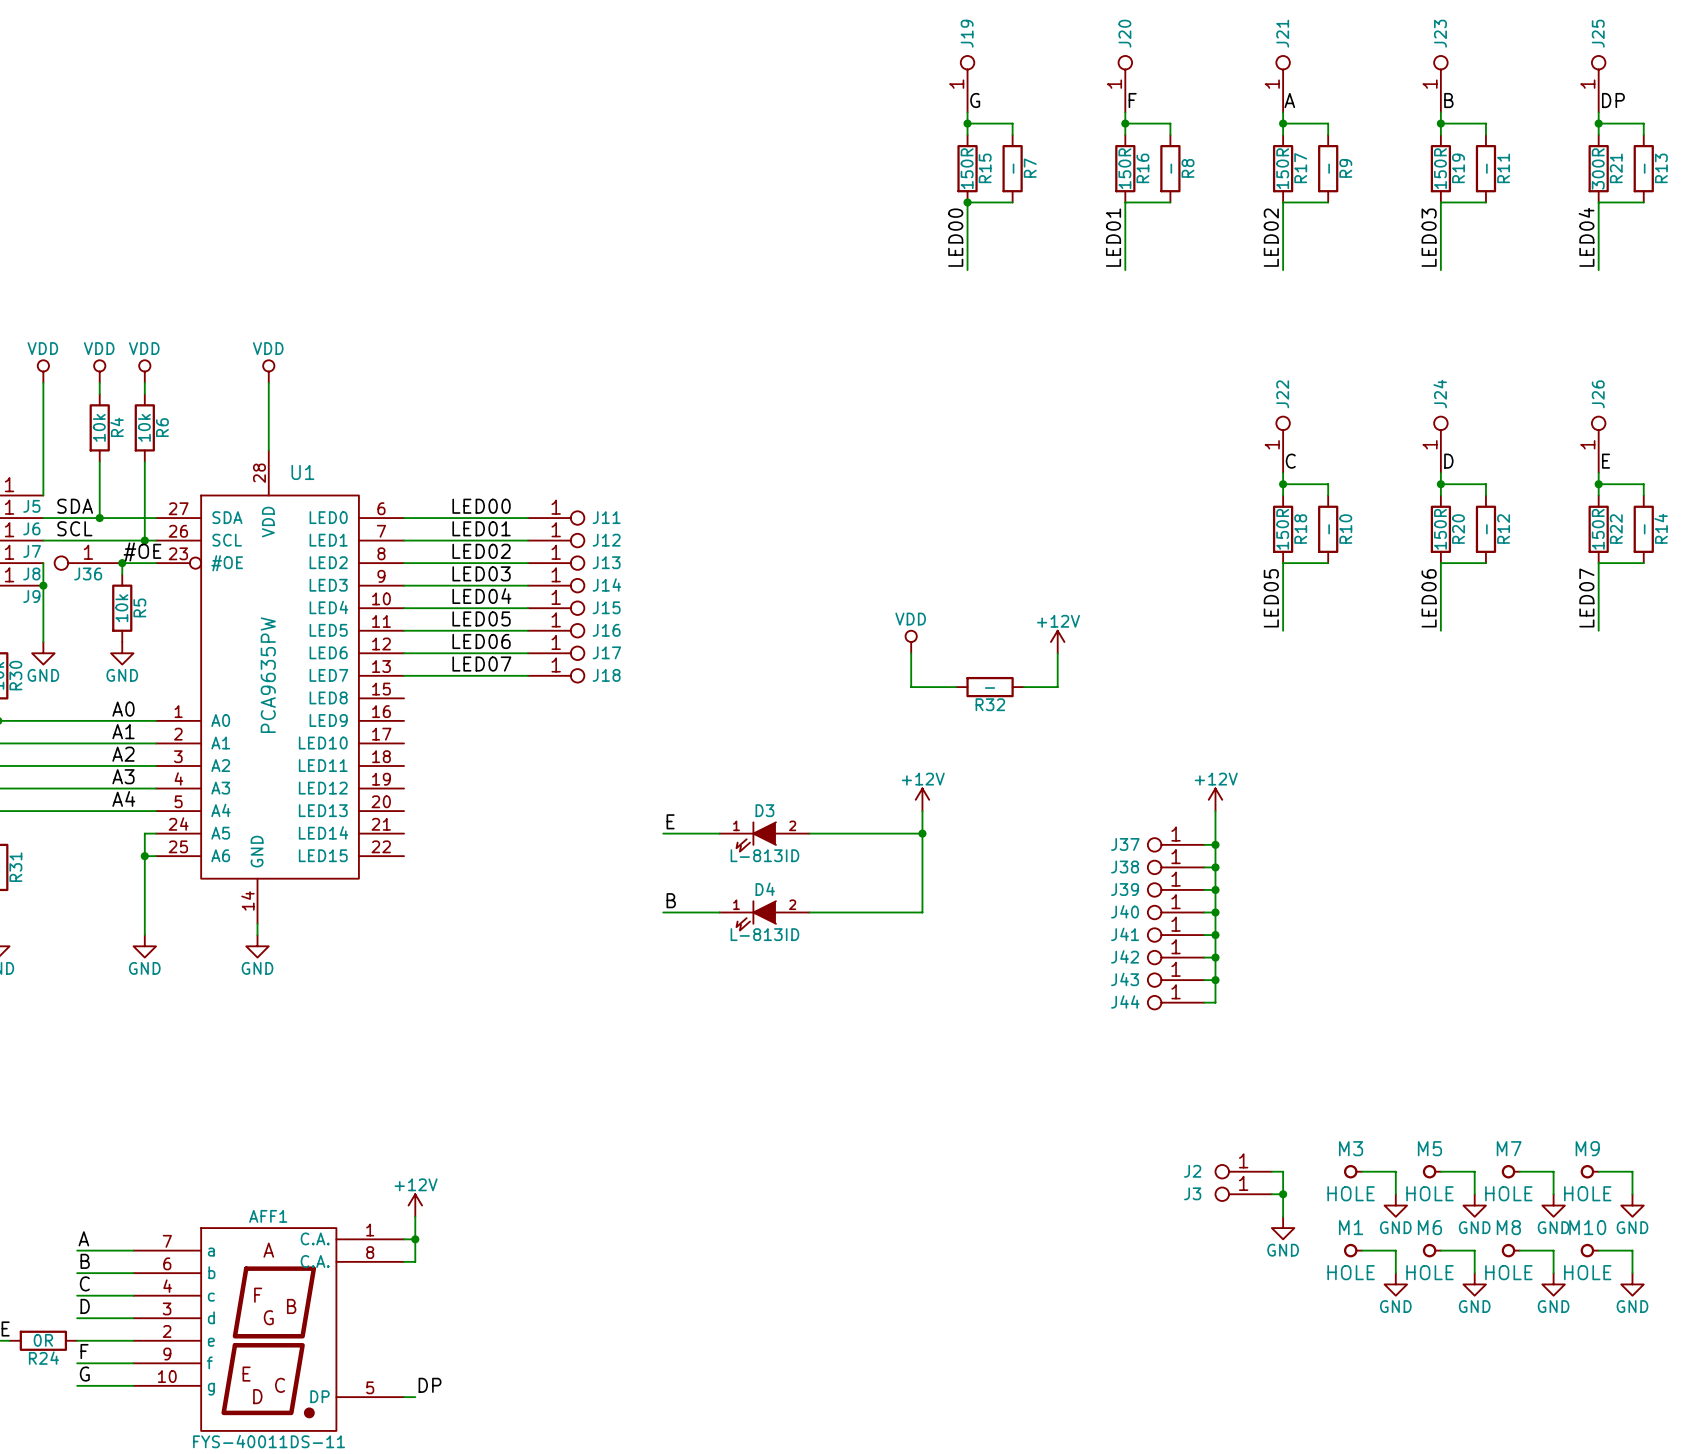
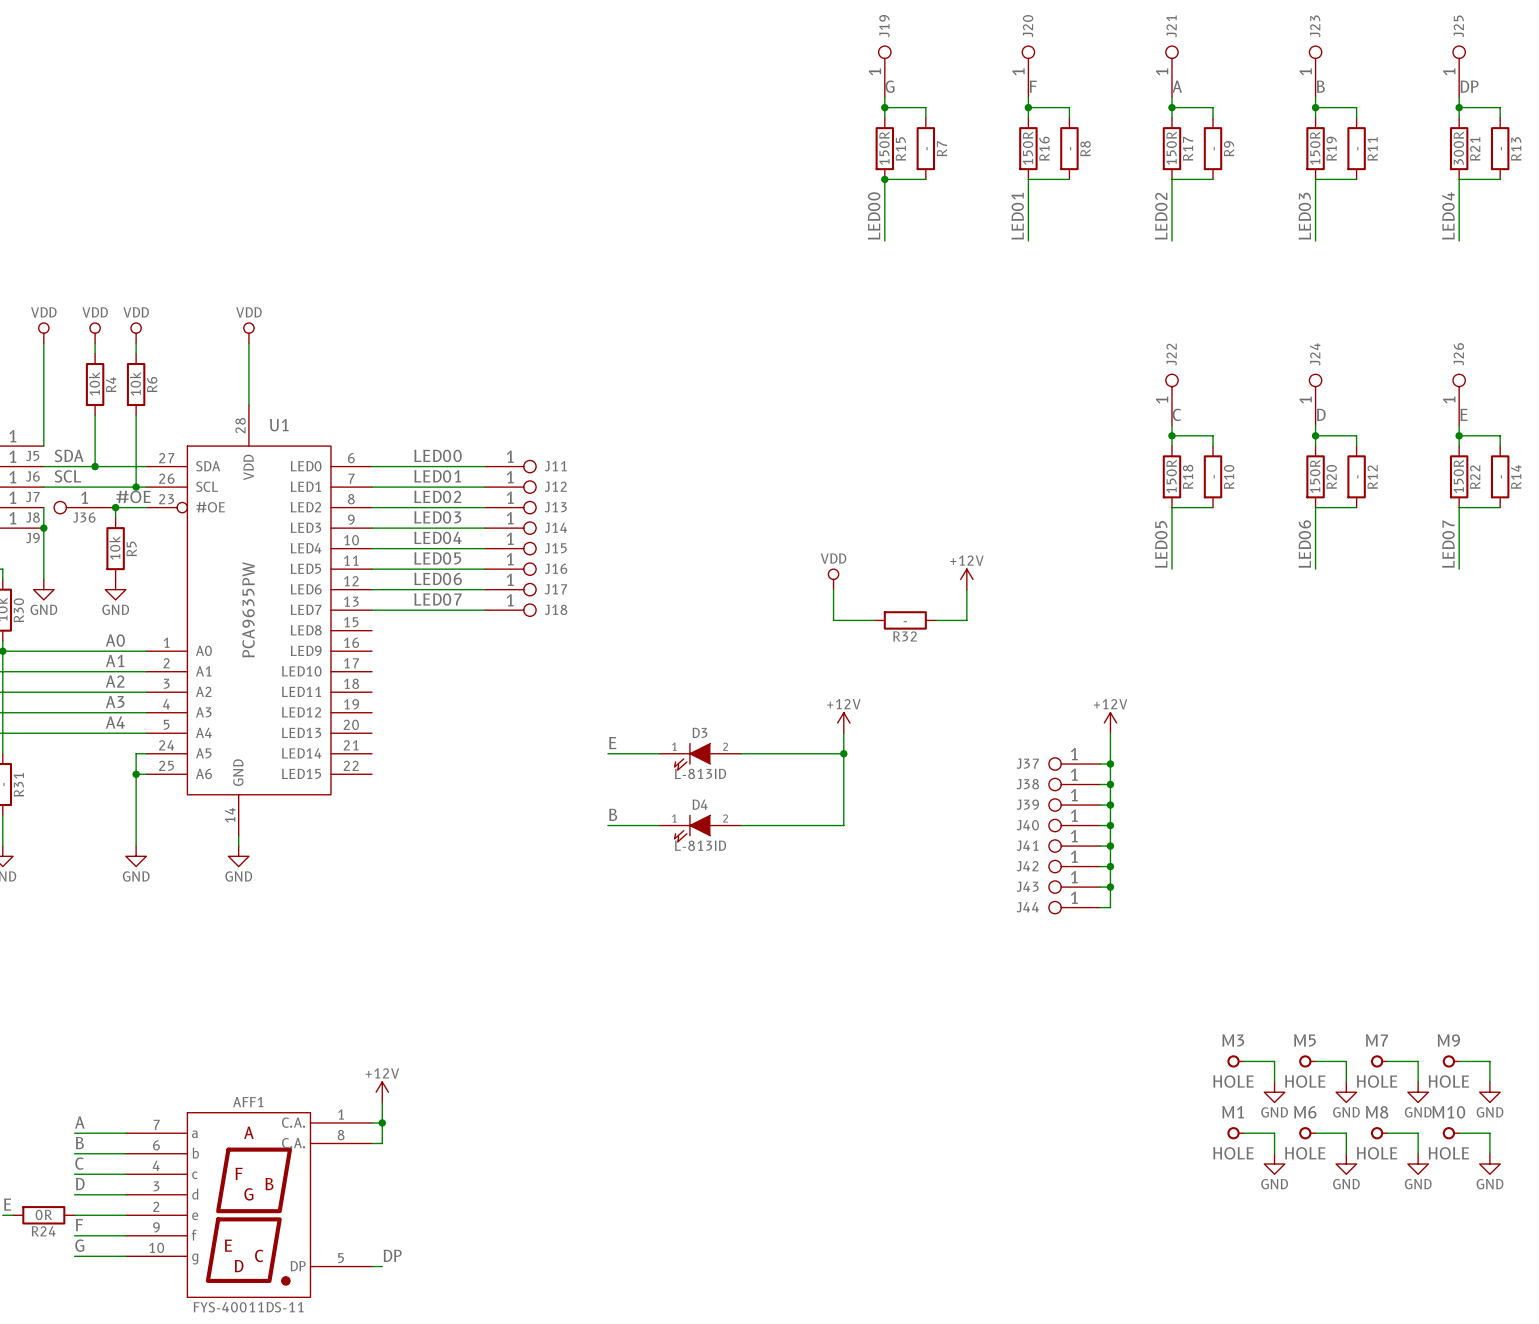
J2: (1243, 1171) -> none
wire: (1271, 1171) (1283, 1171) (1283, 1216) -> none
J3: (1243, 1194) -> none
wire: (1271, 1194) (1283, 1194) -> none
junction: (1283, 1194) -> none
power symbol: GND (1283, 1228) -> none

